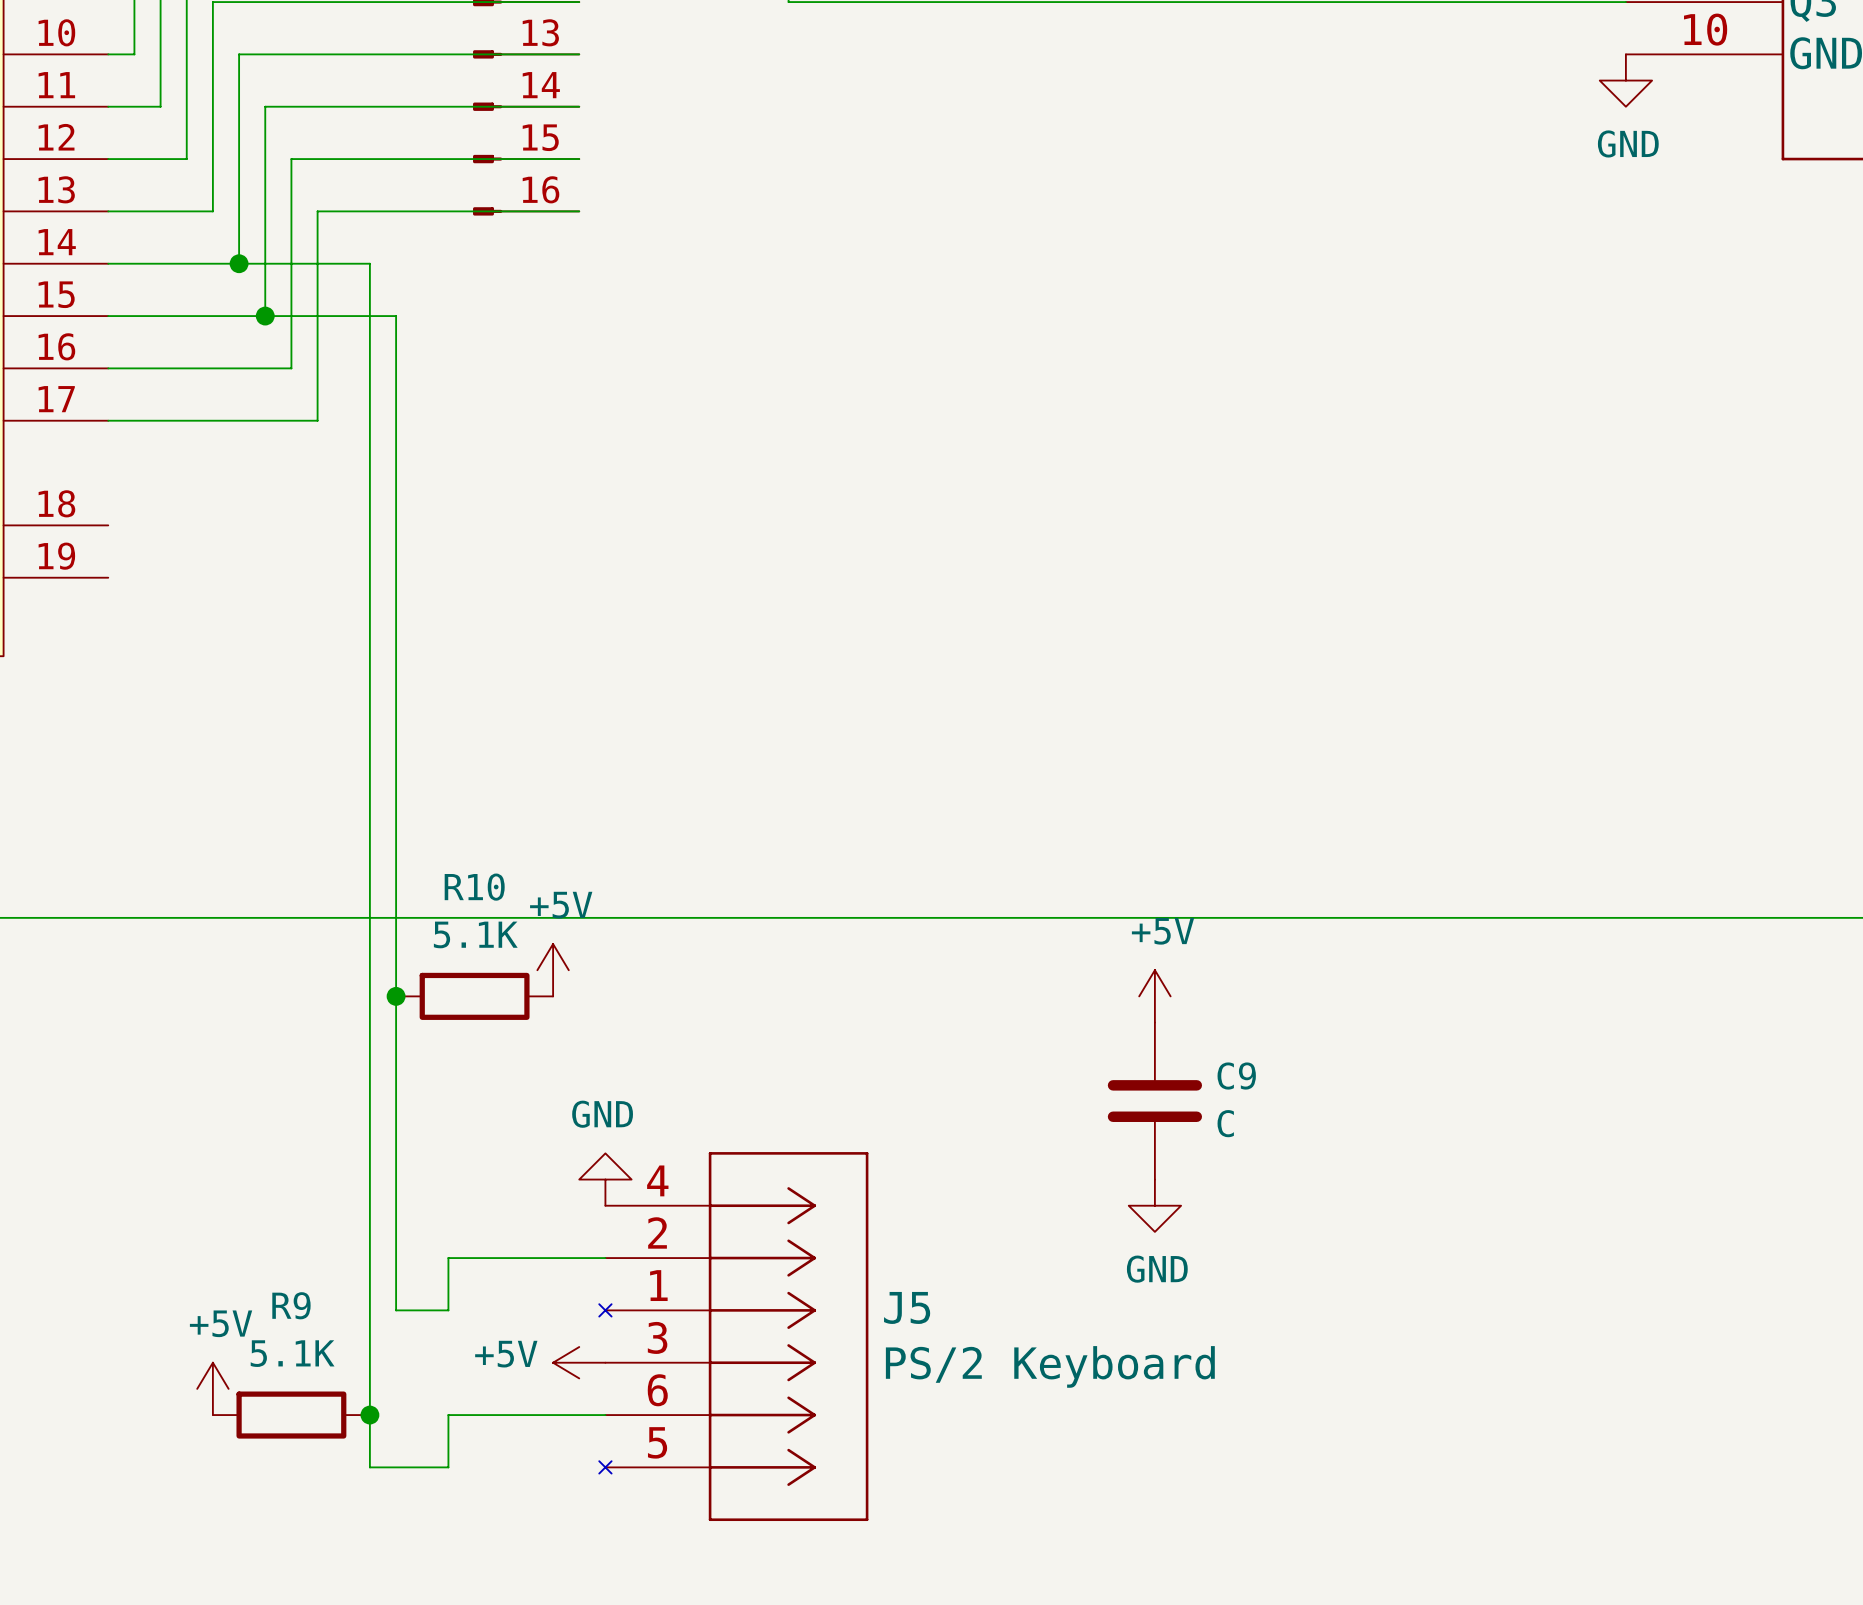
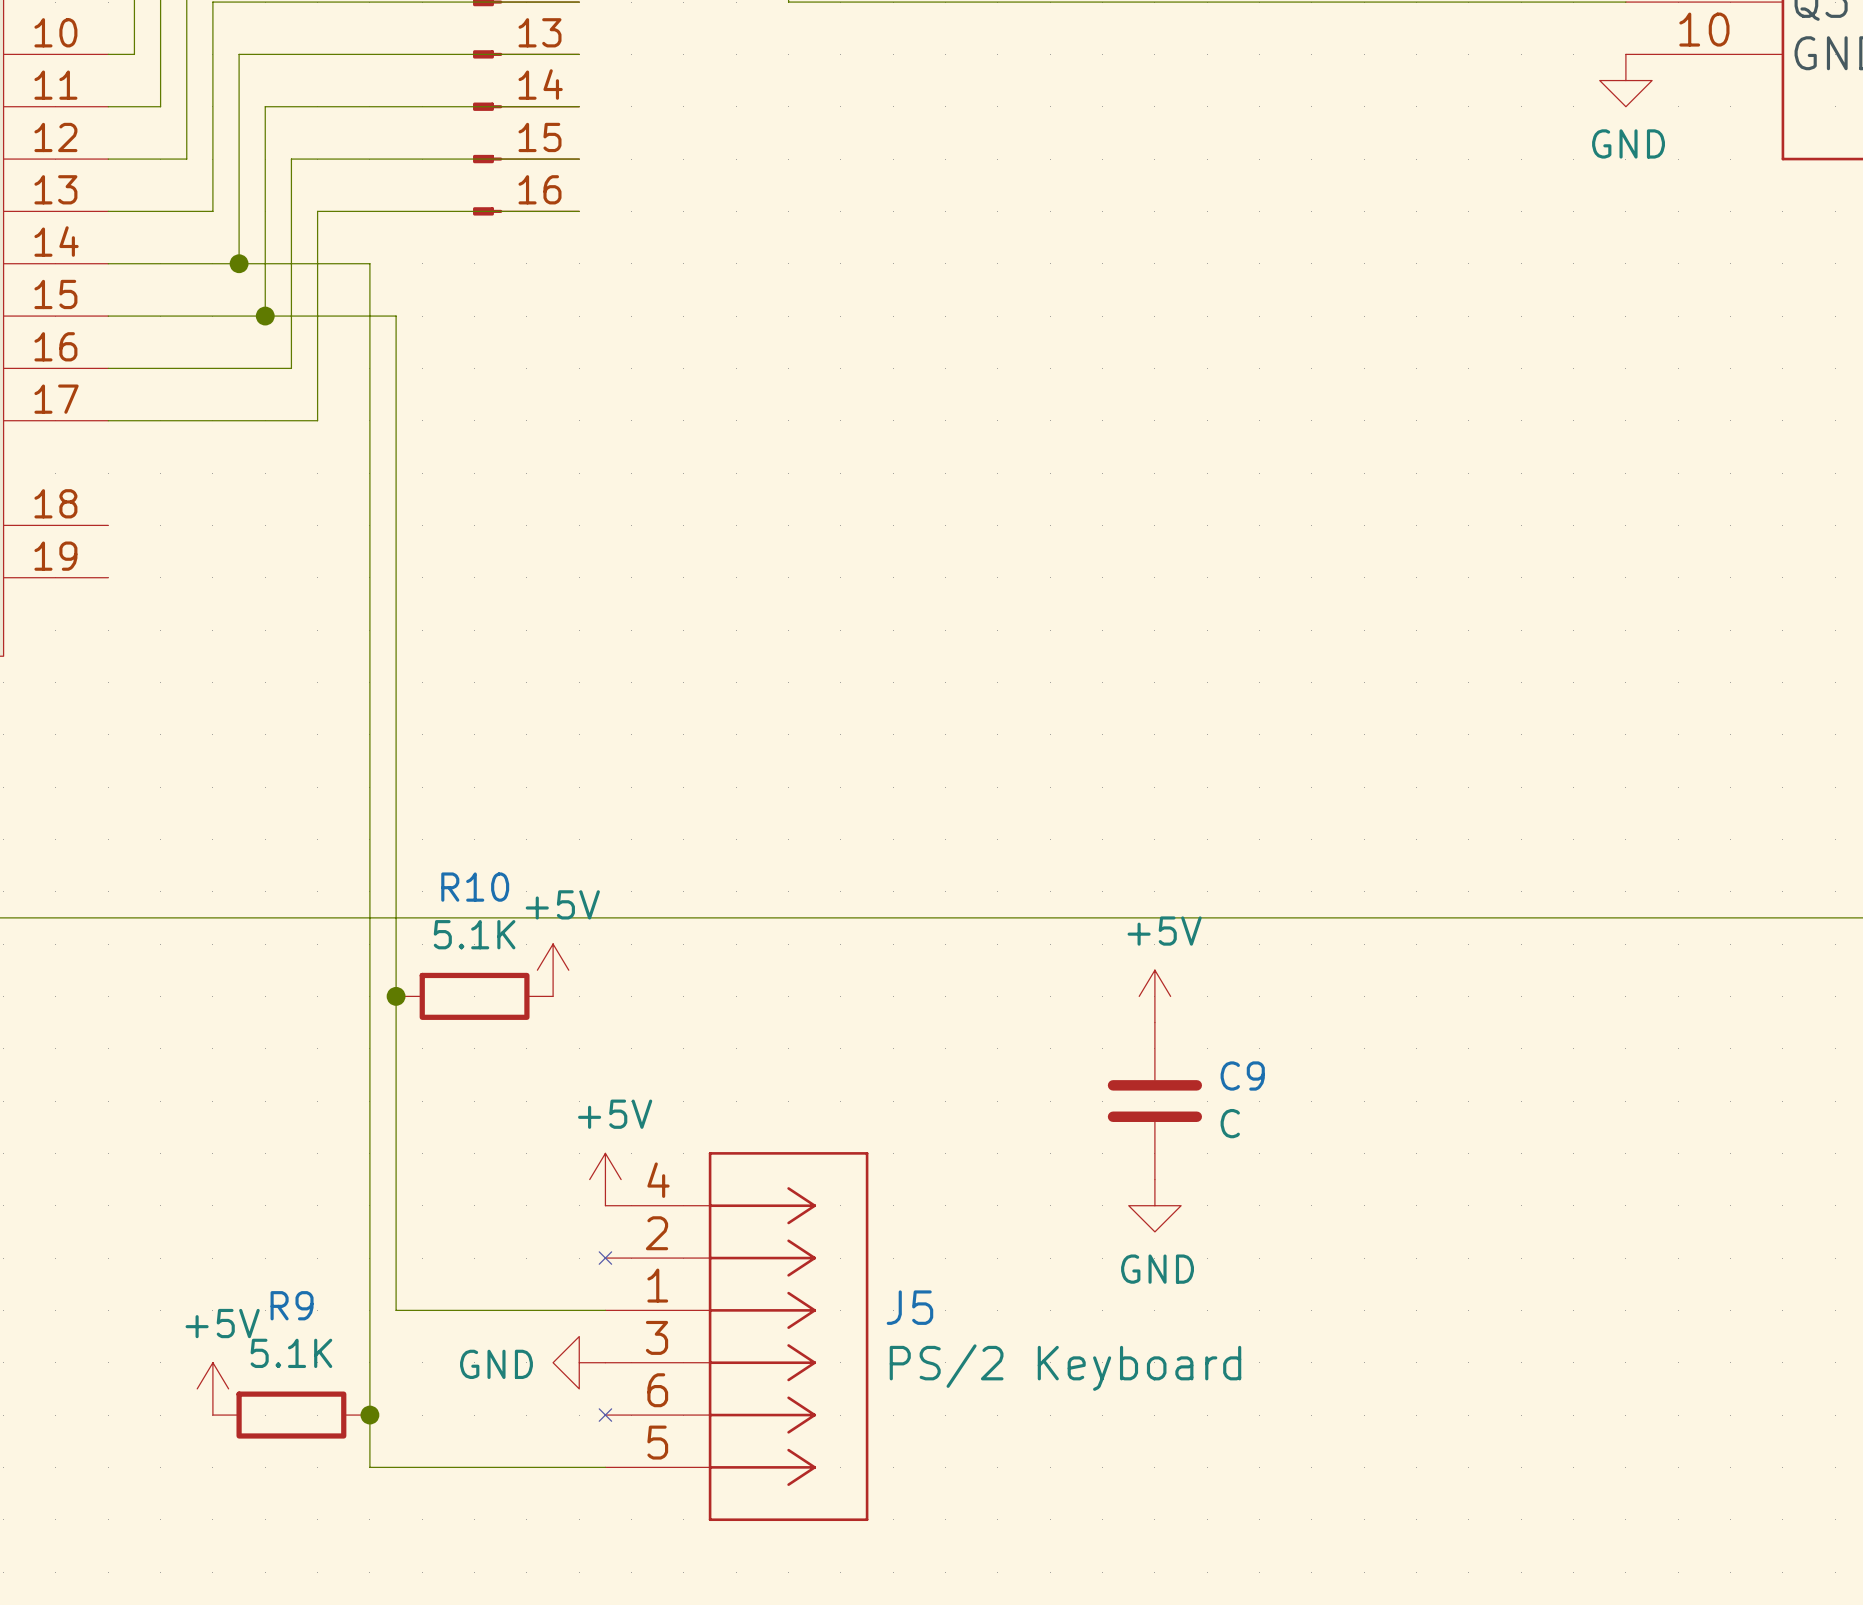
J5 symbol: [599, 1152, 869, 1522] -> [599, 1152, 869, 1522]
power symbol: GND (605, 1179) -> +5V (605, 1179)
wire: (605, 1258) (448, 1258) (448, 1310) -> (605, 1310) (448, 1310)
power symbol: +5V (579, 1362) -> GND (579, 1362)
wire: (605, 1415) (448, 1415) (448, 1467) -> (605, 1467) (448, 1467)

